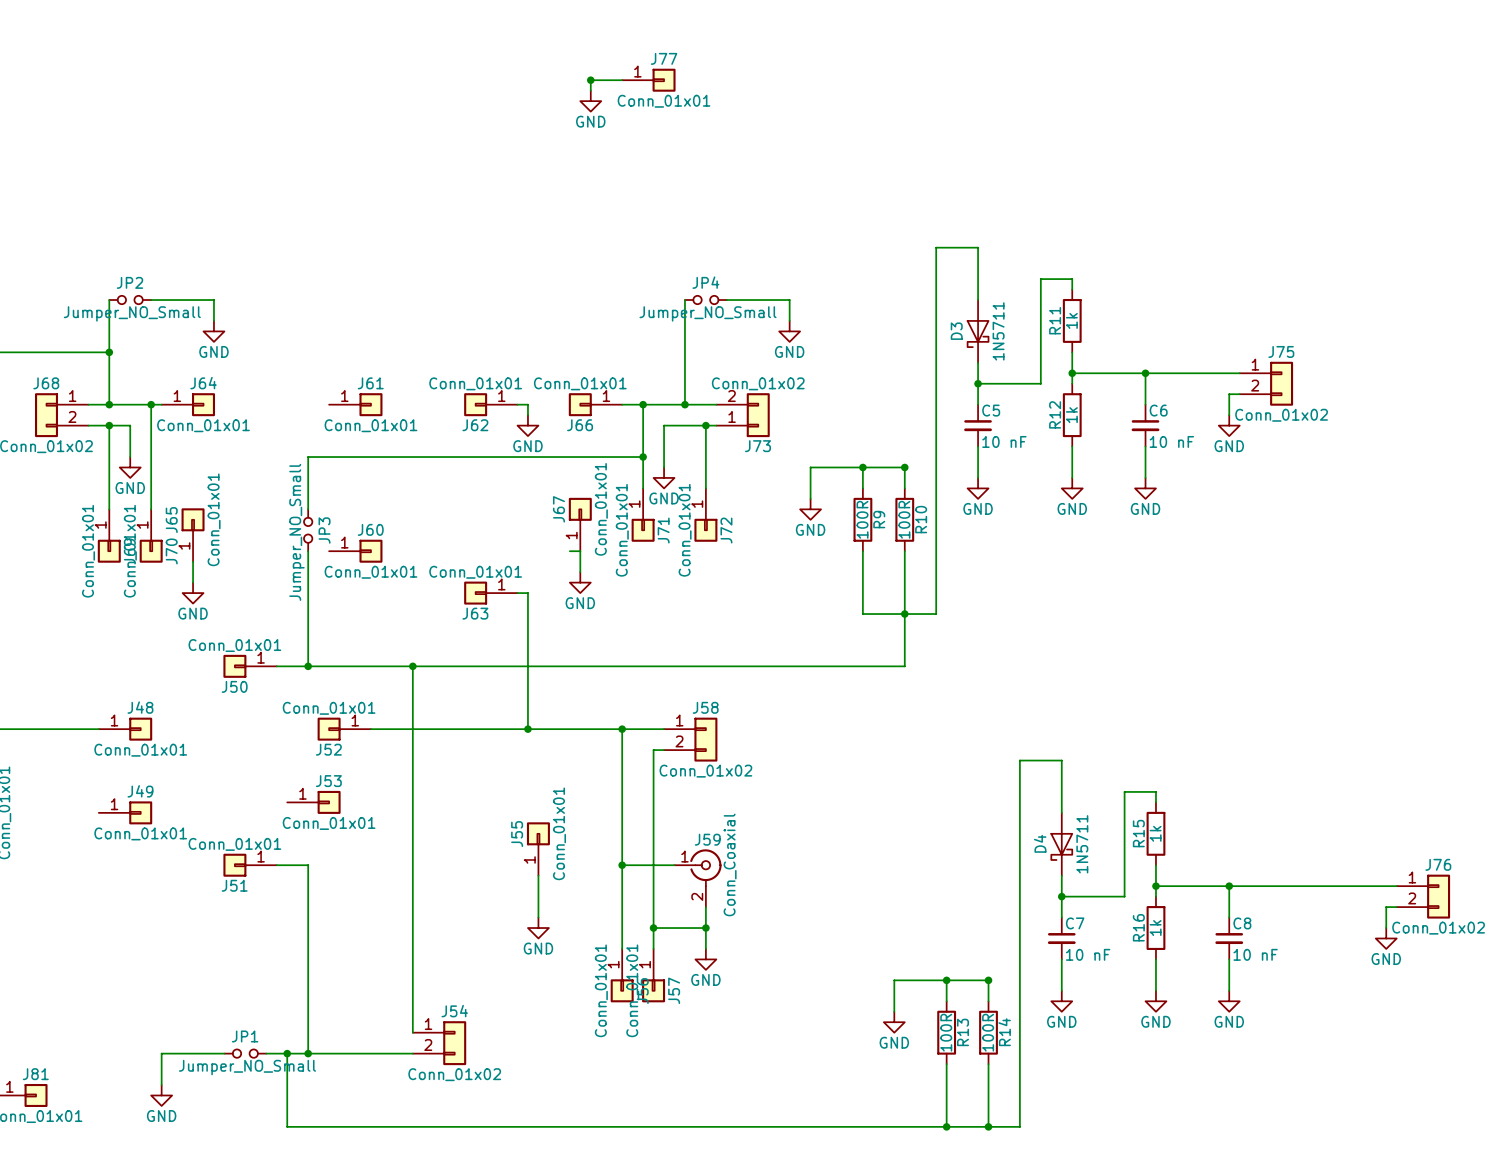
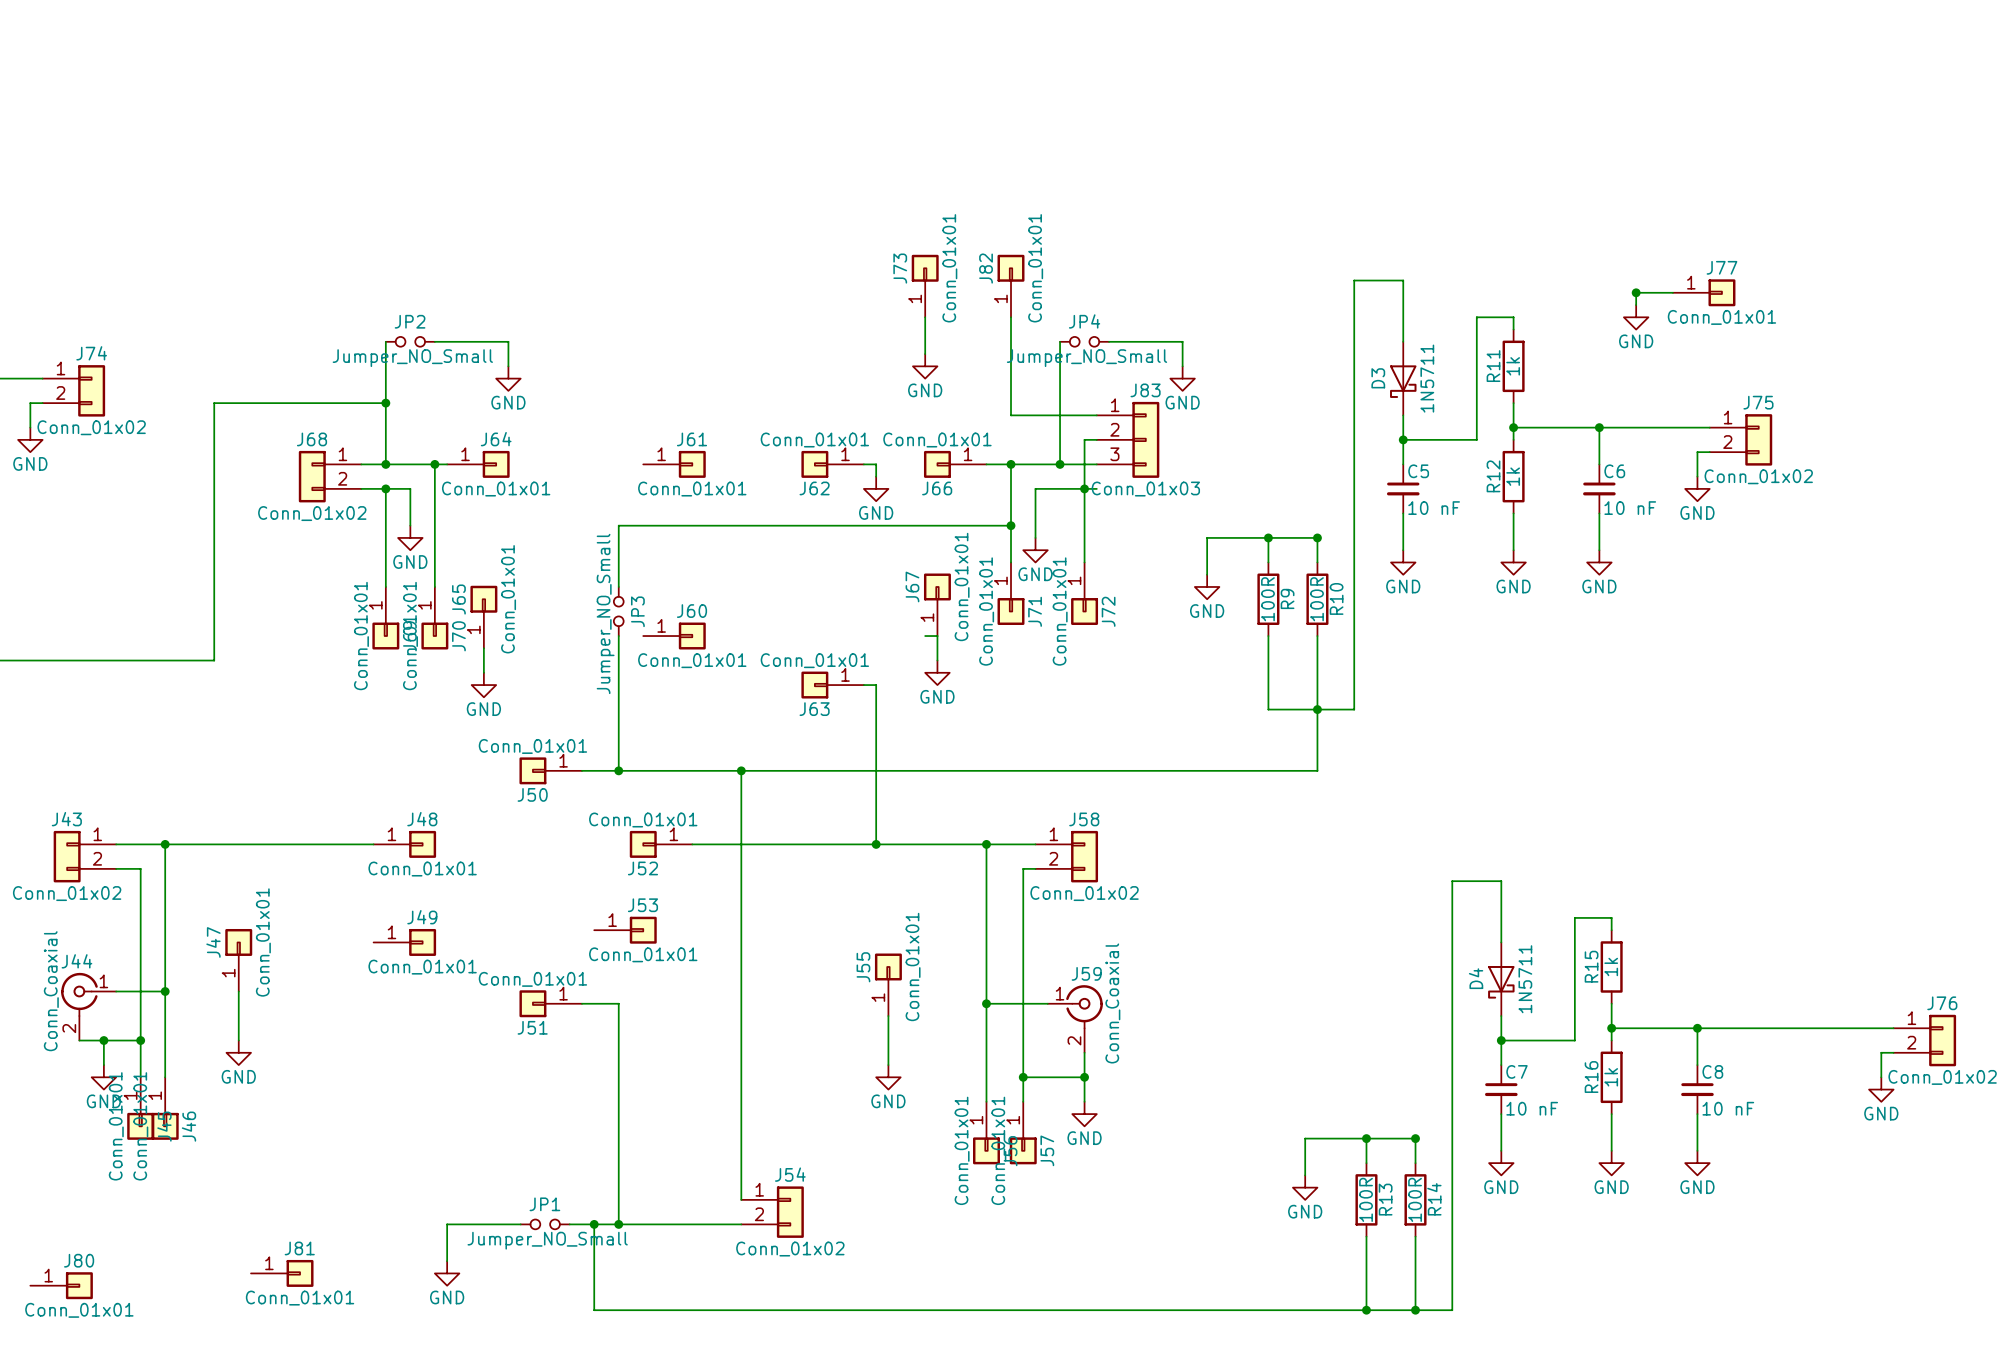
junction: (590, 80) -> none
wire: (622, 80) (590, 80) (590, 90) -> none
J77 position: (648, 80) -> (1704, 292)
power symbol: GND (590, 101) -> none
J82: none -> Conn_01x01 (1011, 286)
junction: none -> (1636, 292)
wire: none -> (1672, 292) (1636, 292) (1636, 305)
wire: none -> (925, 317) (925, 354)
wire: none -> (1011, 317) (1011, 415) (1096, 415)
power symbol: none -> GND (1636, 317)
power symbol: none -> GND (925, 366)
wire: none -> (1096, 439) (1084, 439) (1084, 488)
J83: none -> Conn_01x03 (1128, 439)
J73 value: Conn_01x02 (758, 383) -> Conn_01x01 (949, 268)
J73 symbol: [716, 393, 770, 438] -> [911, 254, 939, 318]
J73 name position: J73 (757, 446) -> J73 (900, 268)

